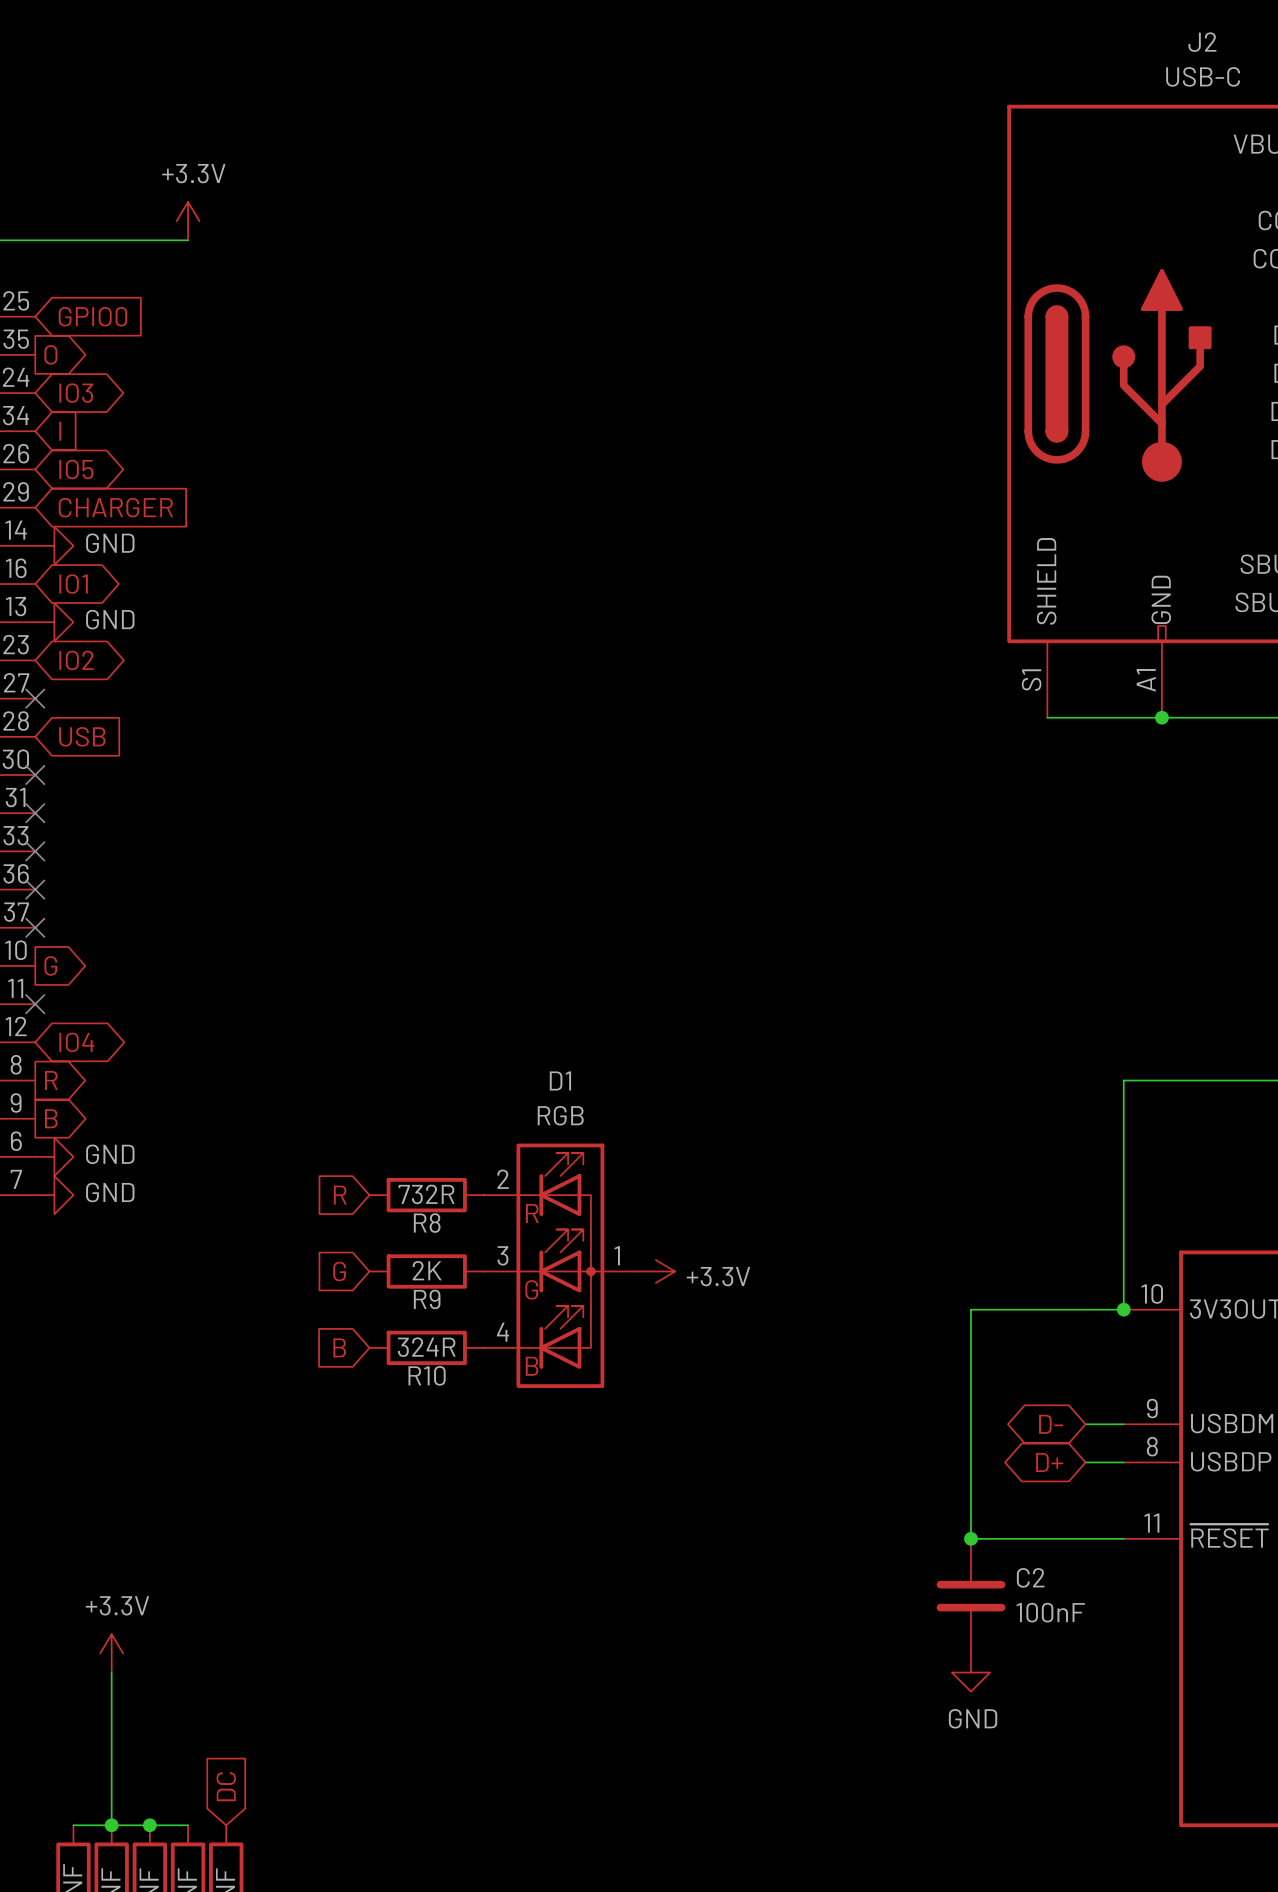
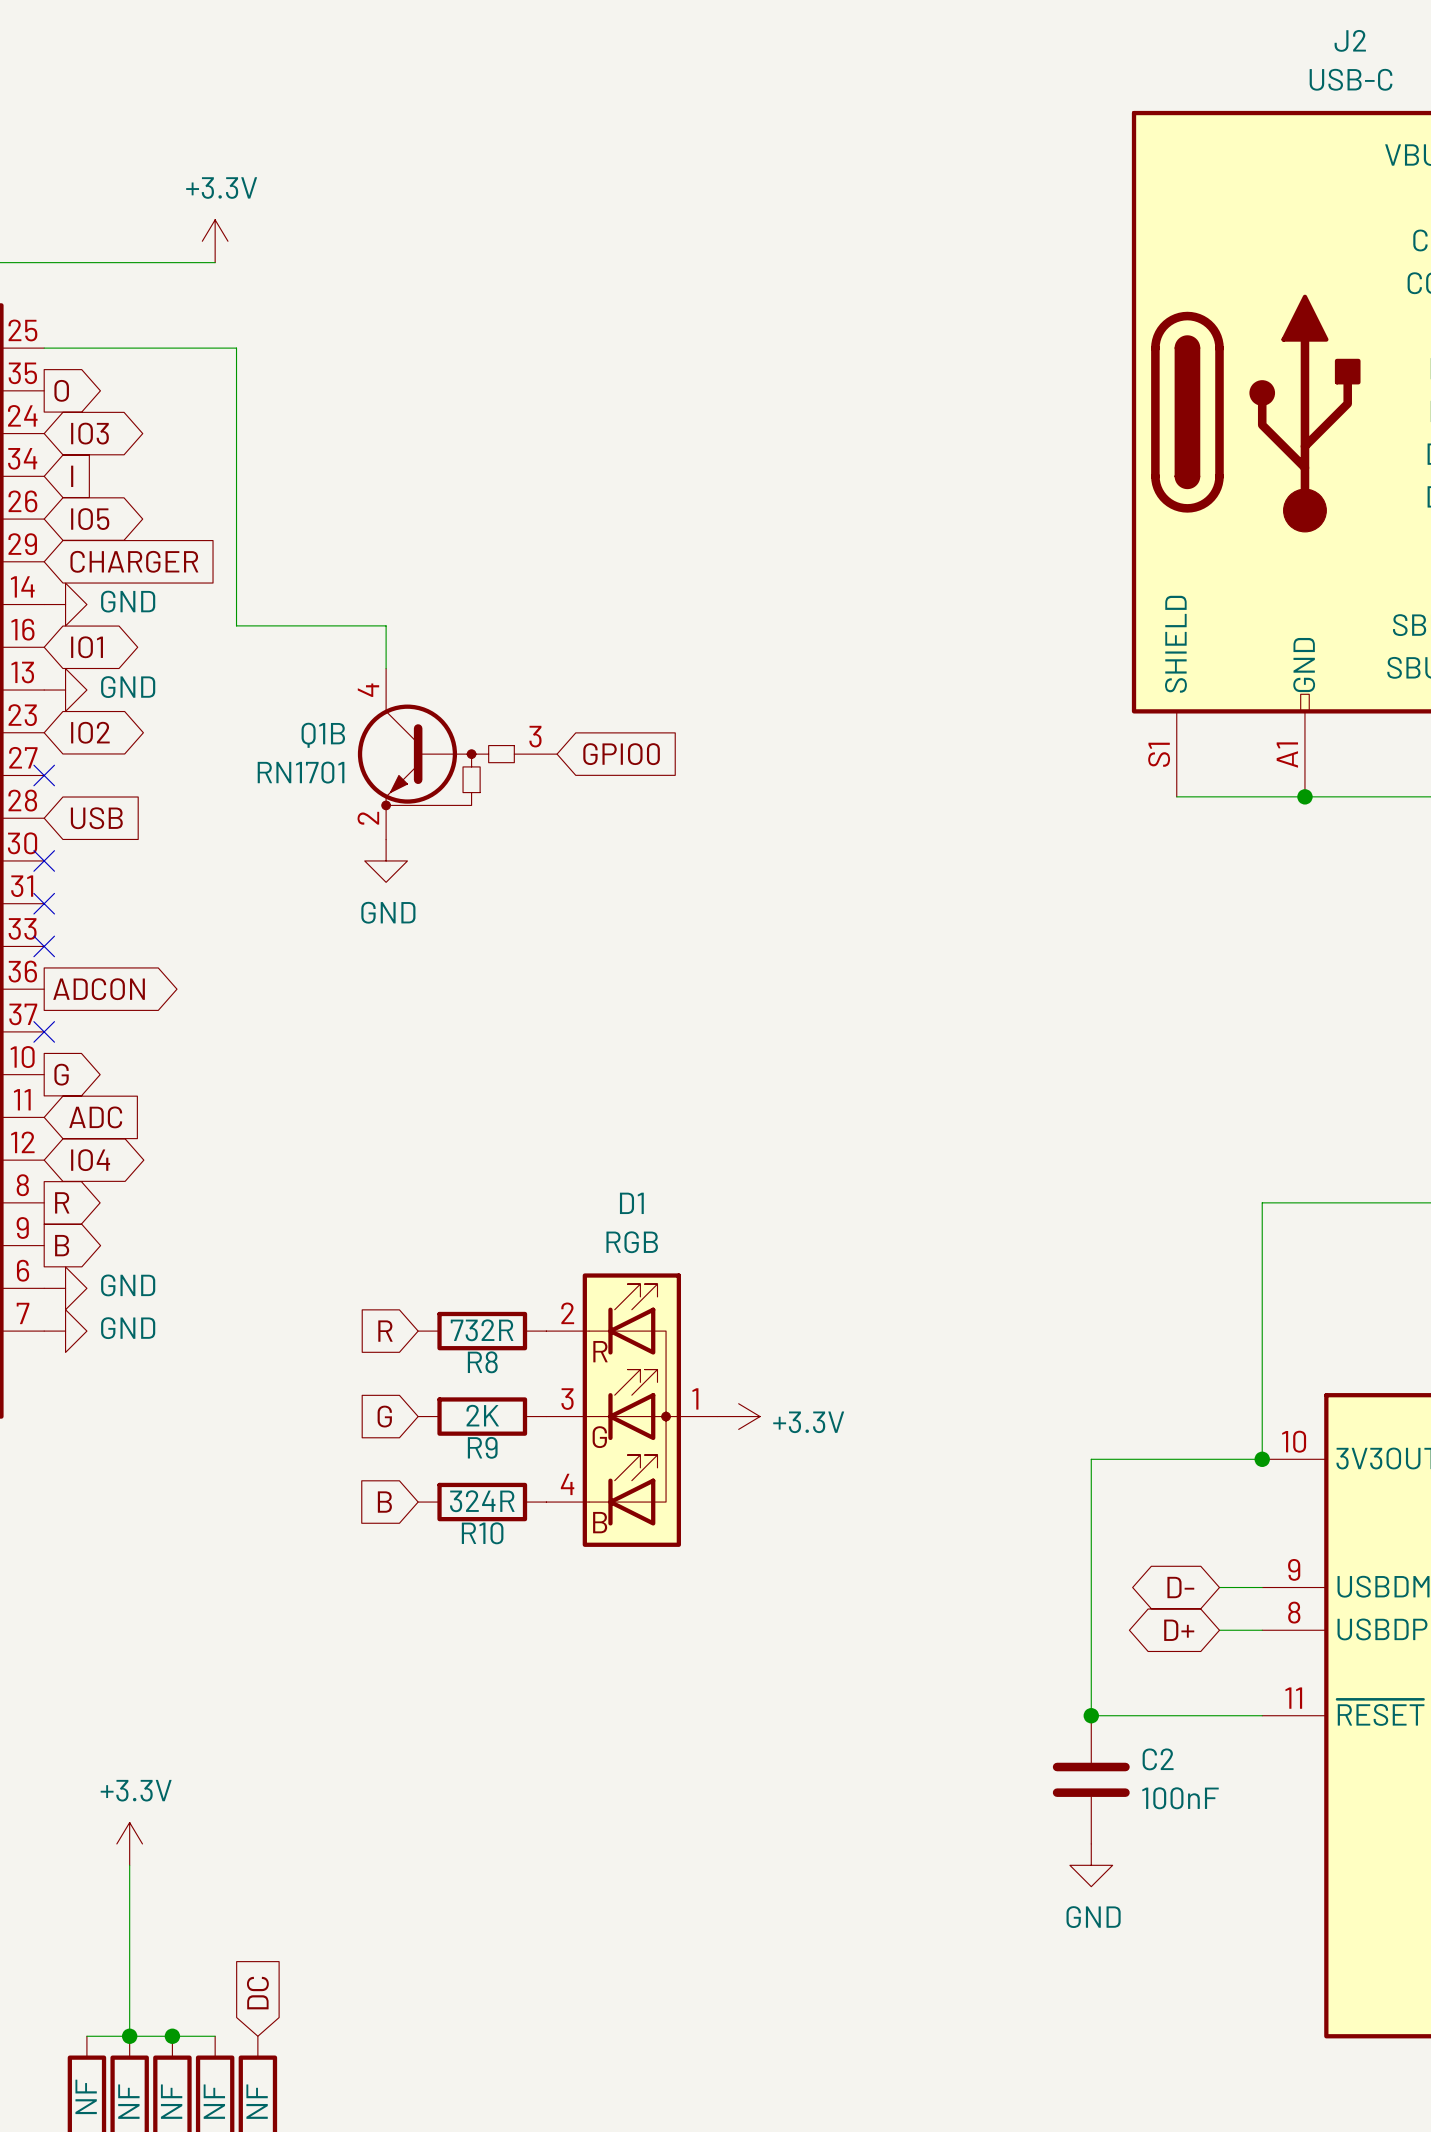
wire: none -> (44, 348) (236, 348) (236, 625) (386, 625) (386, 668)
global label: GPIO0 (92, 316) -> none
Q1B: none -> RN1701 (457, 754)
global label: none -> GPIO0 (621, 754)
power symbol: none -> GND (386, 860)
no-connect mark: (35, 889) -> none
global label: none -> ADCON (99, 989)
no-connect mark: (35, 1004) -> none
global label: none -> ADC (95, 1117)

